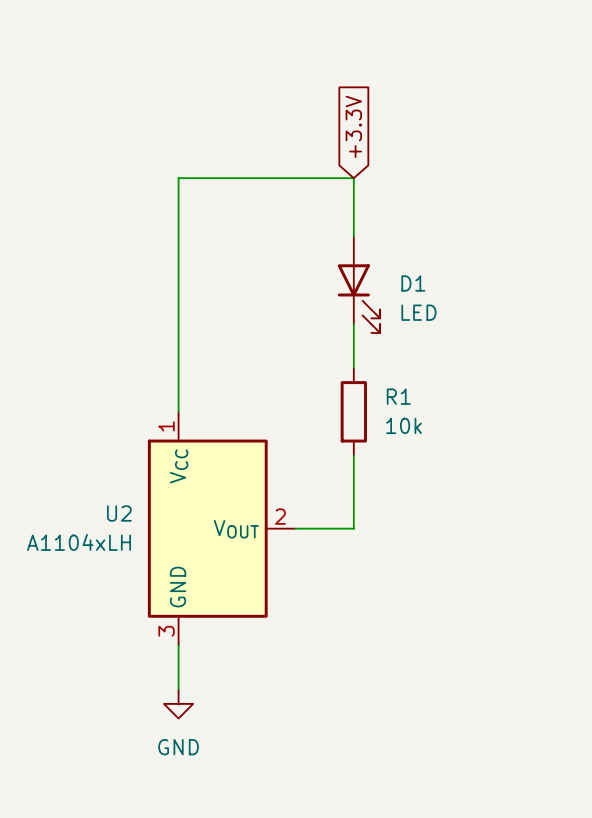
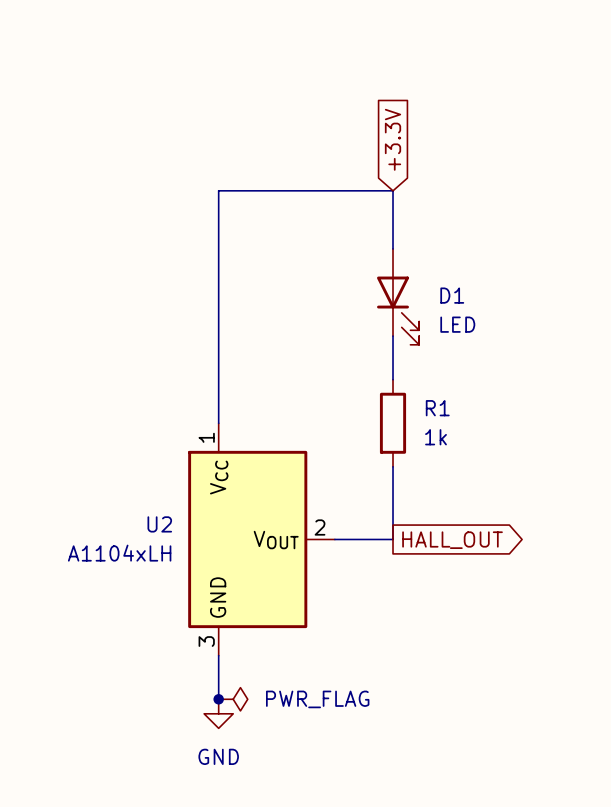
R1 value: 10k (404, 425) -> 1k (436, 437)
global label: none -> HALL_OUT (452, 540)
junction: none -> (218, 699)
power symbol: none -> PWR_FLAG (233, 699)

